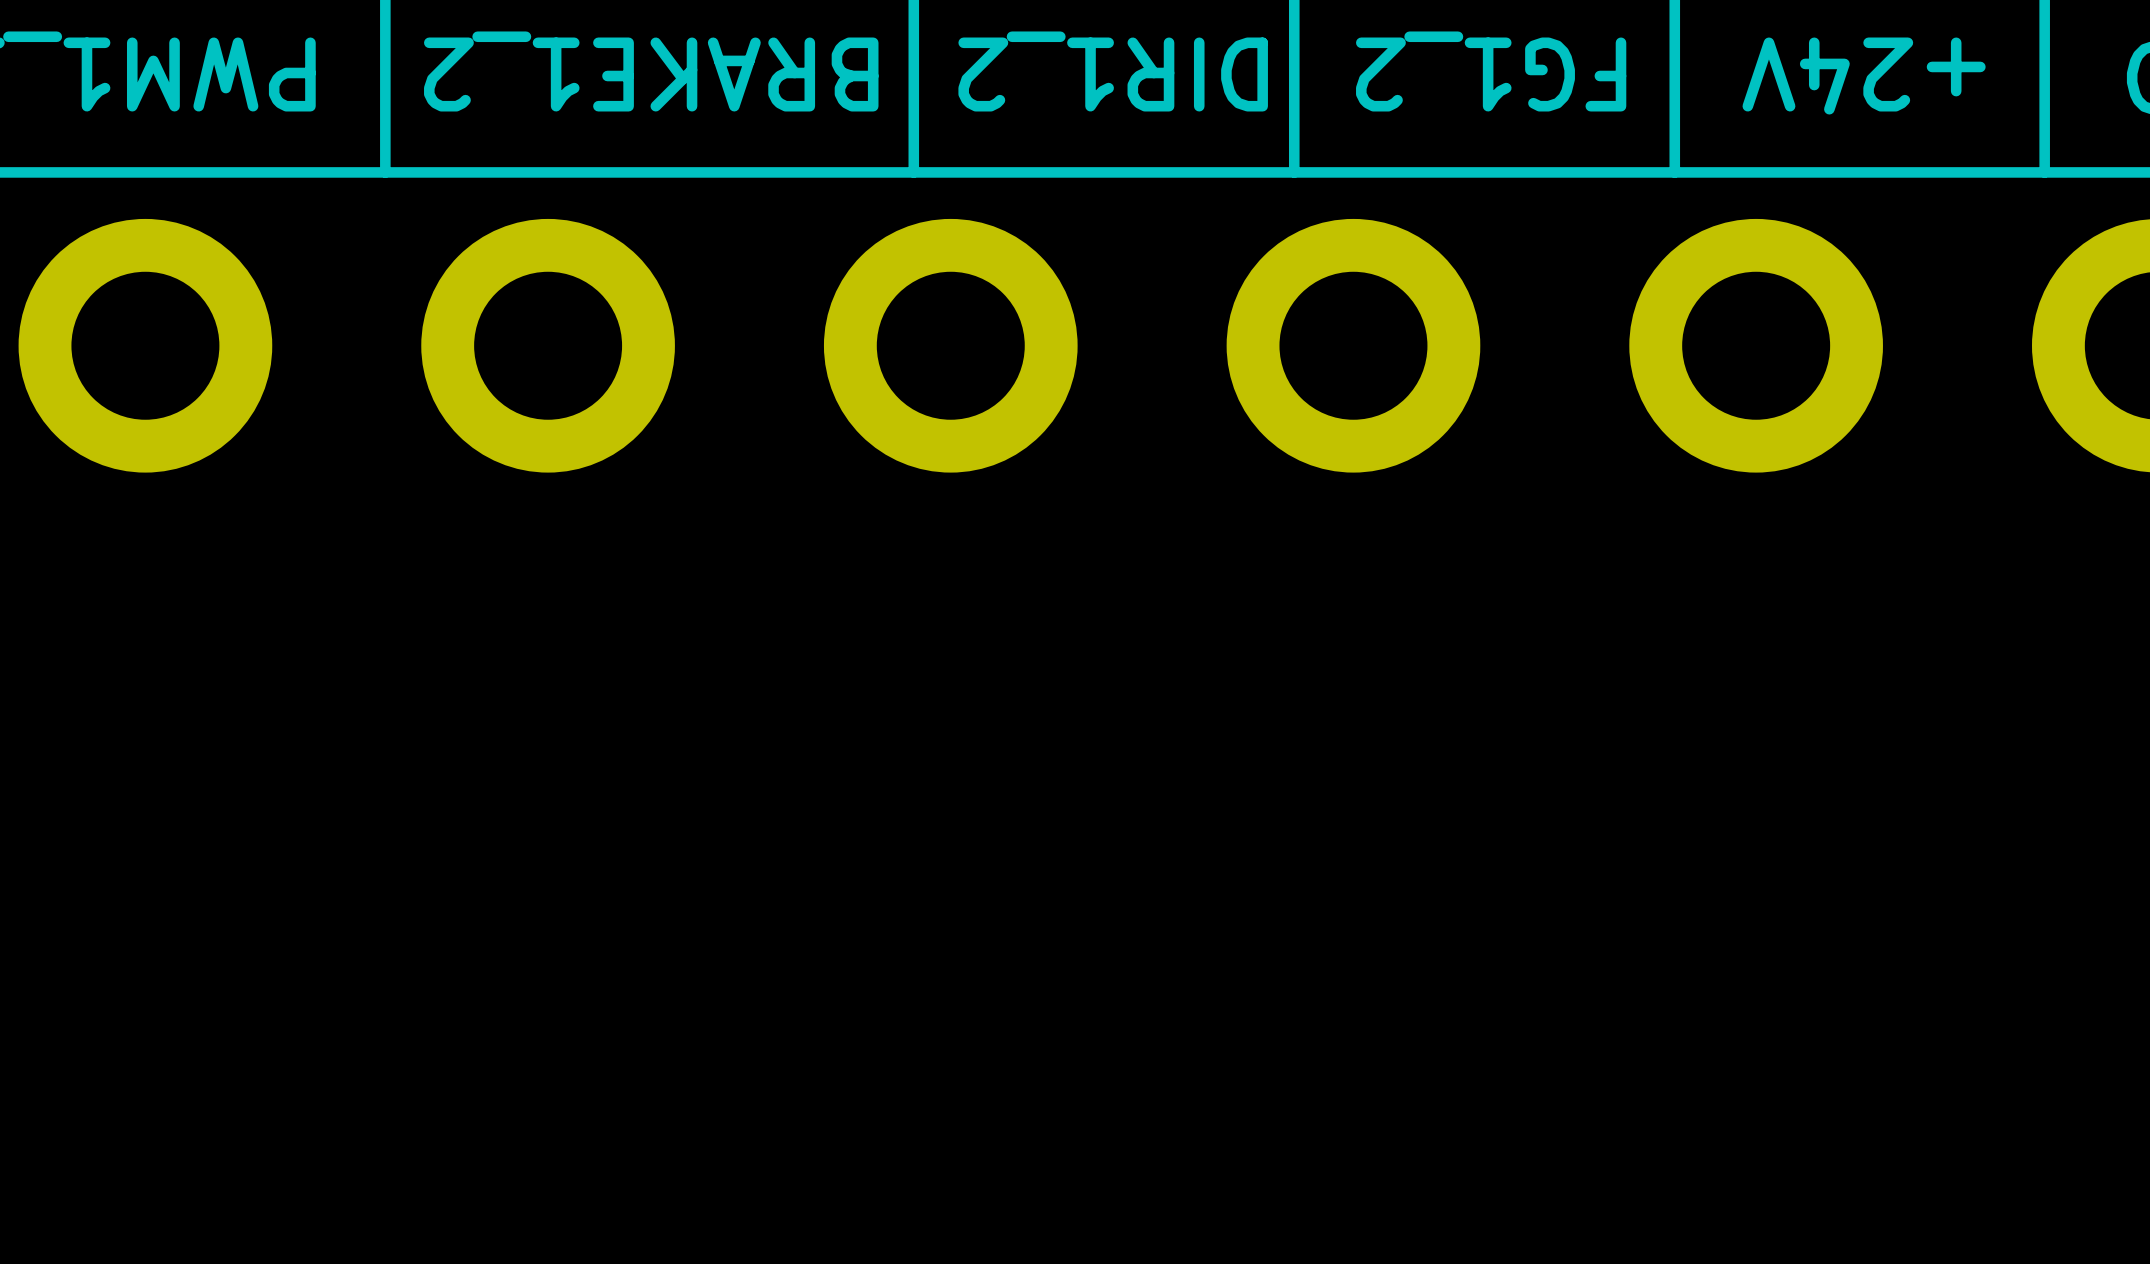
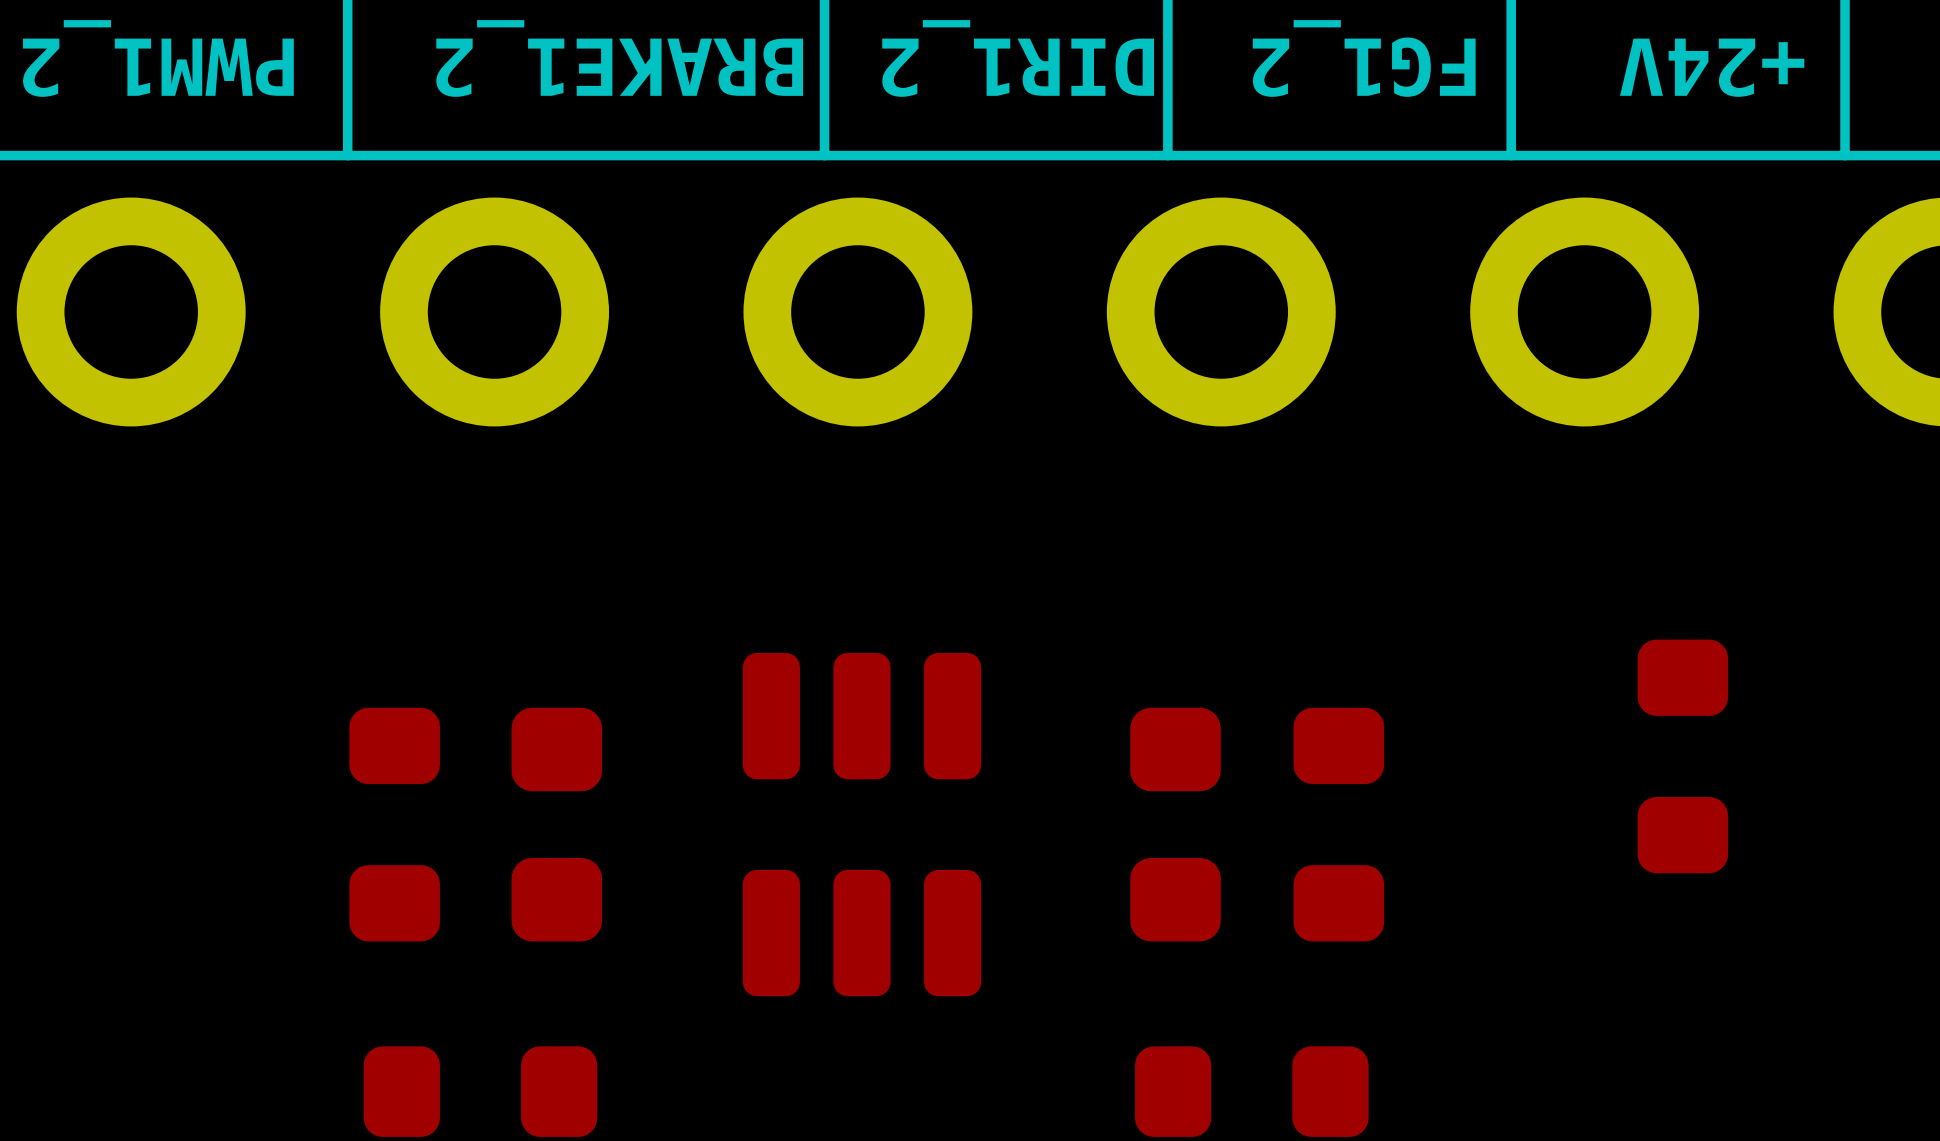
part: none -> (1682, 756)
part: none -> (394, 824)
part: none -> (556, 824)
part: none -> (861, 824)
part: none -> (1175, 824)
part: none -> (1338, 824)
part: none -> (480, 1091)
part: none -> (1251, 1091)

